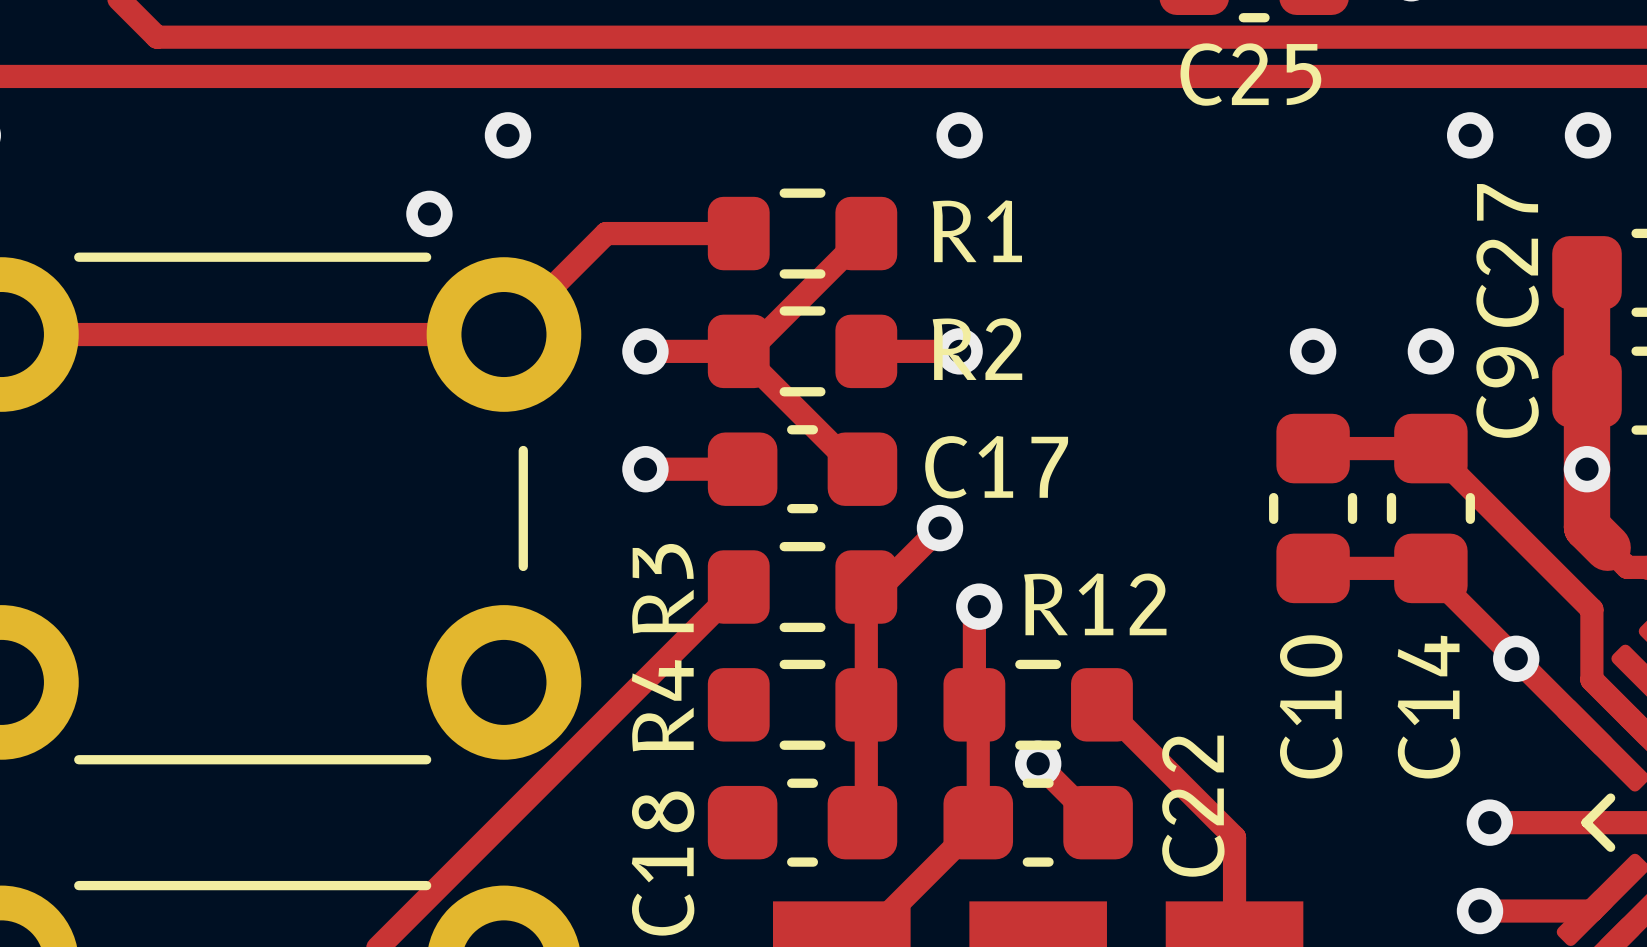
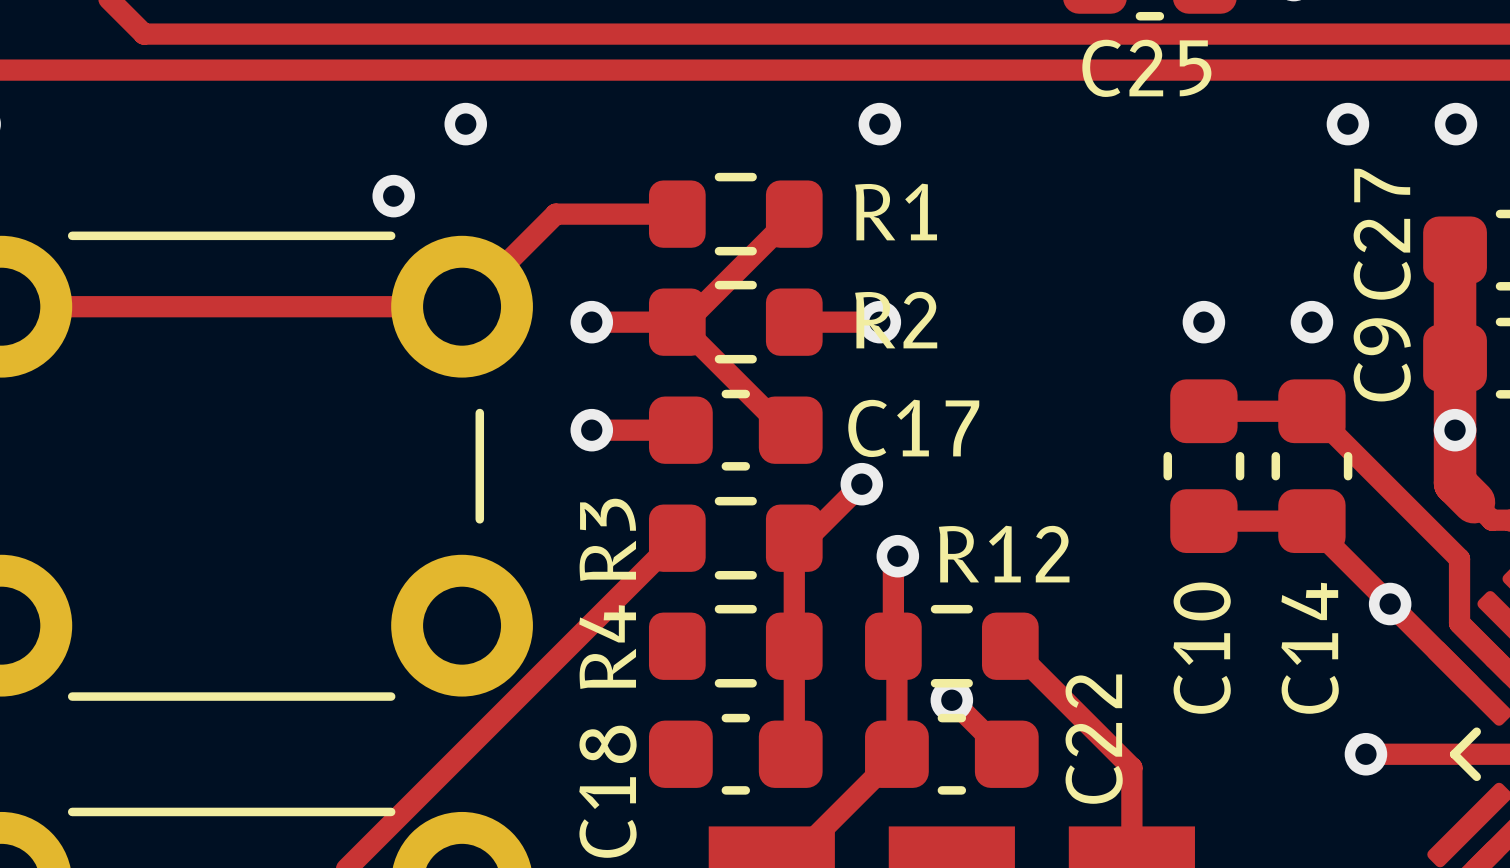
track: (1602, 899) (1591, 911) (1480, 911) -> none
via: (1480, 911) -> none

